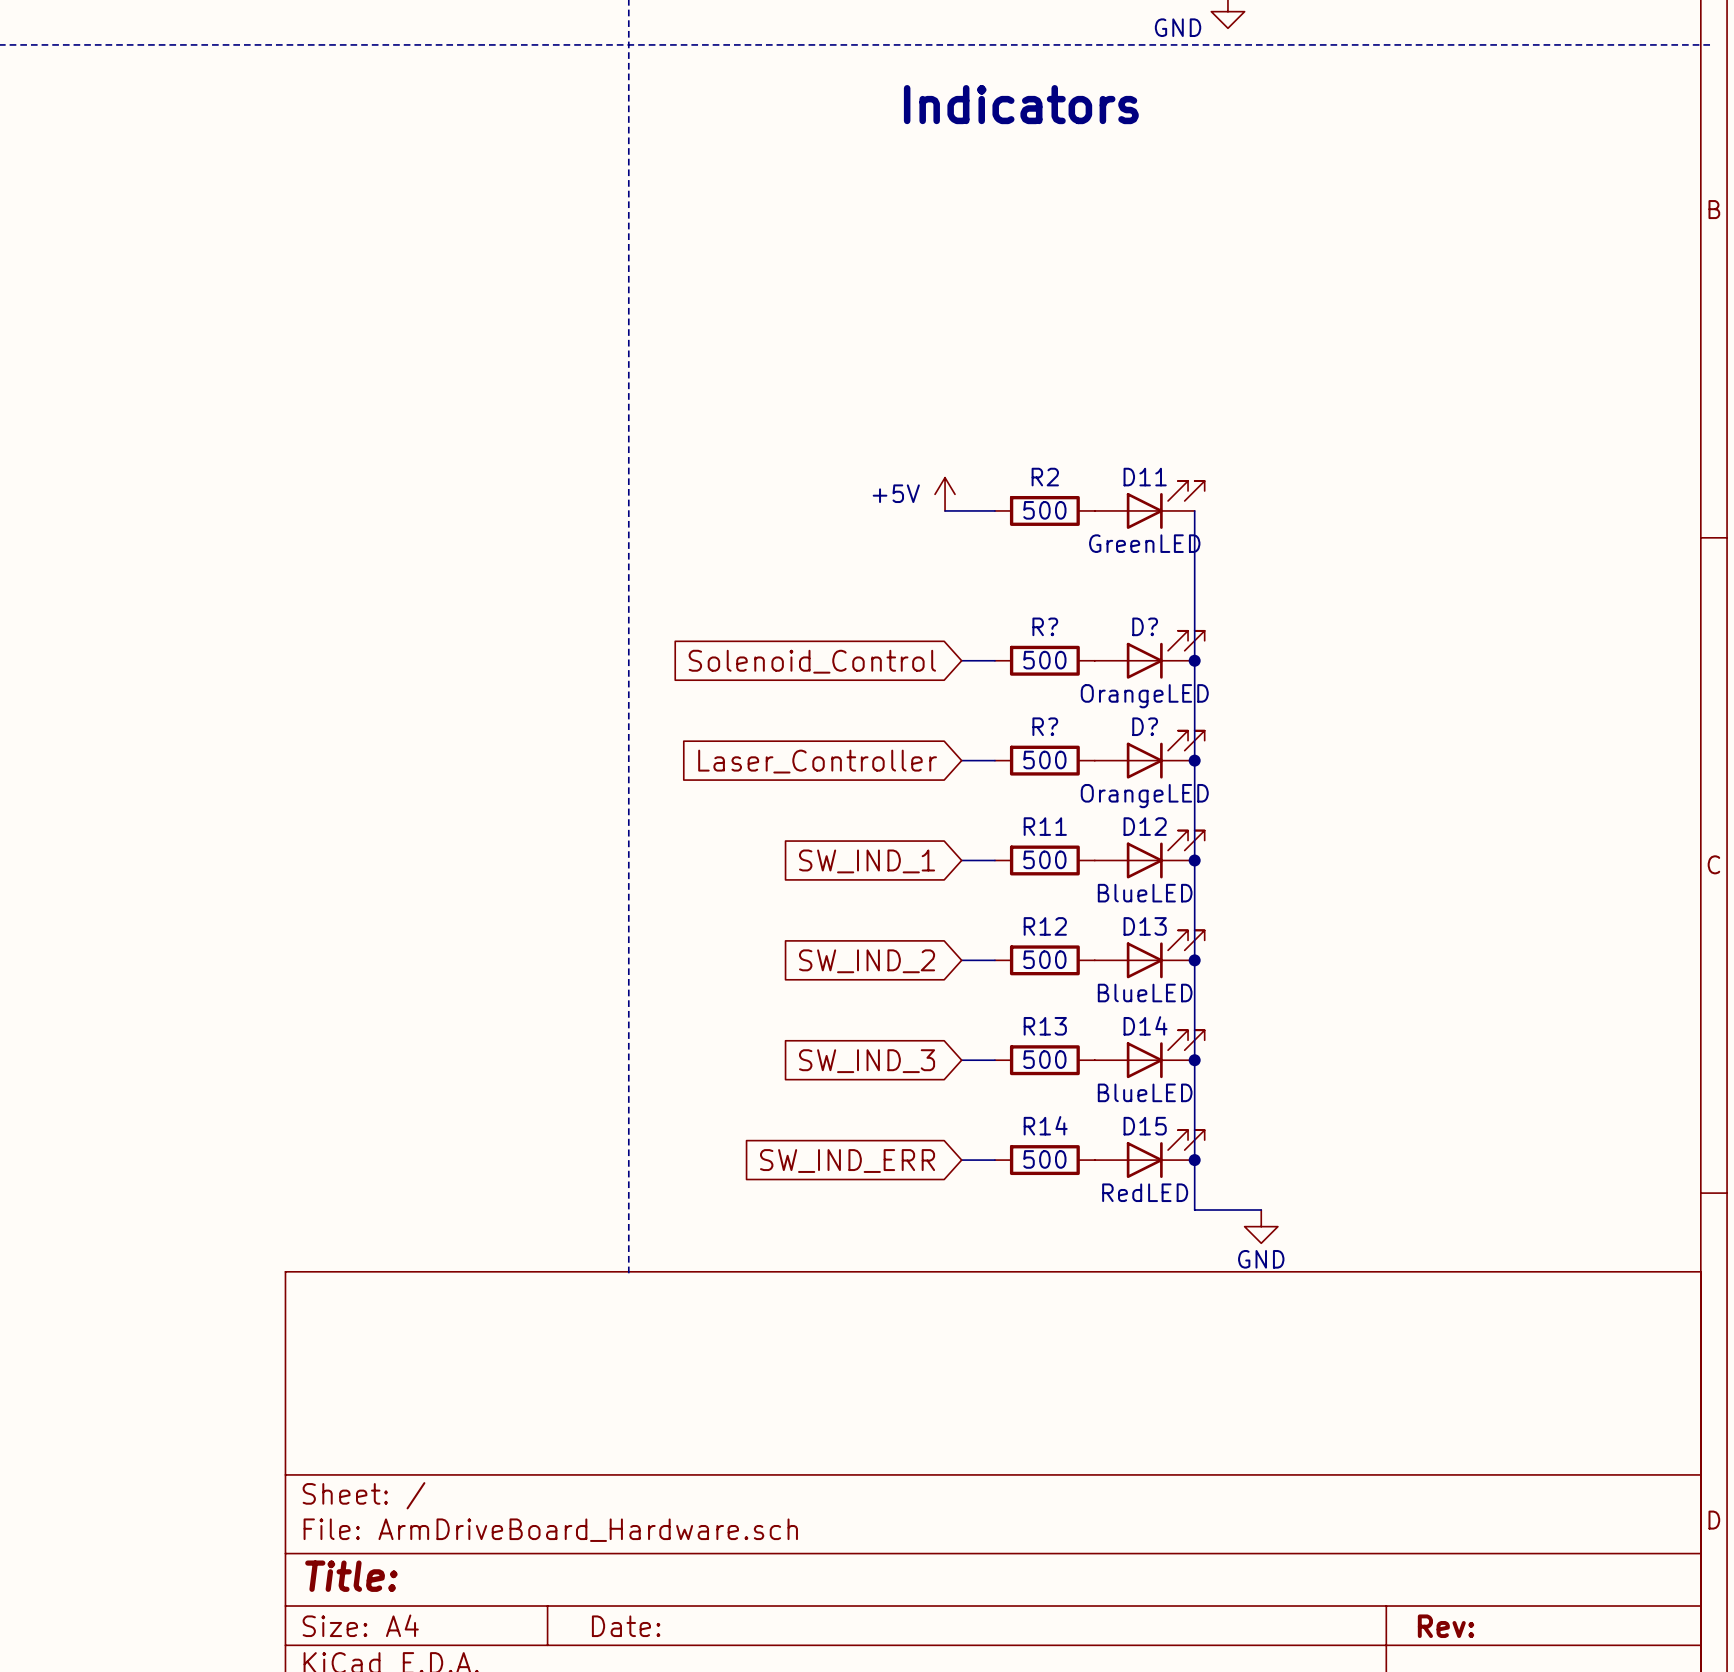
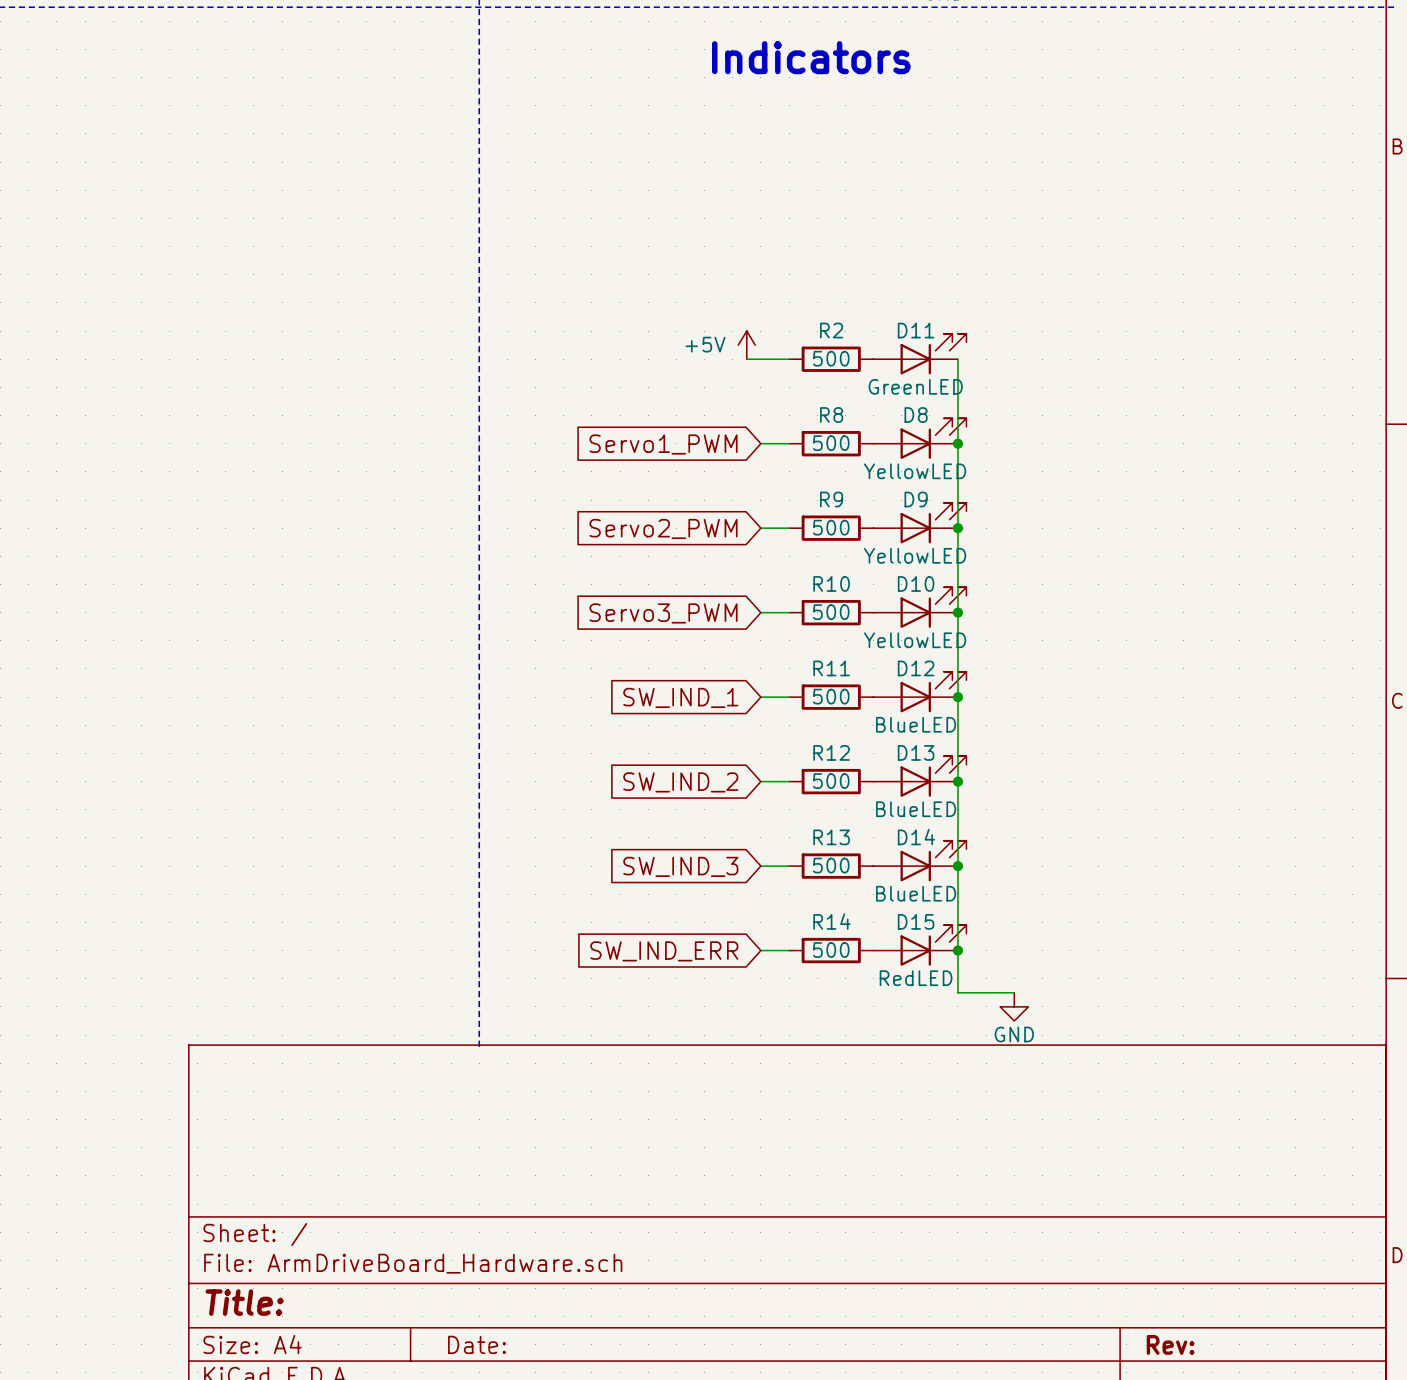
wire: none -> (957, 359) (957, 401)
power symbol position: +5V (945, 494) -> +5V (746, 345)
D11 position: (1149, 504) -> (919, 354)
wire: (945, 510) (994, 510) -> (746, 359) (789, 359)
R2 position: (1044, 510) -> (831, 359)
D8: none -> YellowLED (919, 438)
wire: none -> (760, 443) (789, 443)
R8: none -> 500 (831, 443)
junction: none -> (957, 443)
global label: none -> Servo1_PWM (663, 444)
R? name: R? (1045, 626) -> R9 (831, 499)
D? name: D? (1145, 626) -> D9 (916, 499)
global label: Solenoid_Control (812, 661) -> Servo2_PWM (663, 528)
D? value: OrangeLED (1144, 696) -> YellowLED (915, 555)
R? name: R? (1045, 726) -> R10 (831, 583)
D? name: D? (1145, 726) -> D10 (916, 583)
global label: Laser_Controller (817, 761) -> Servo3_PWM (663, 613)
D? value: OrangeLED (1144, 796) -> YellowLED (915, 640)

